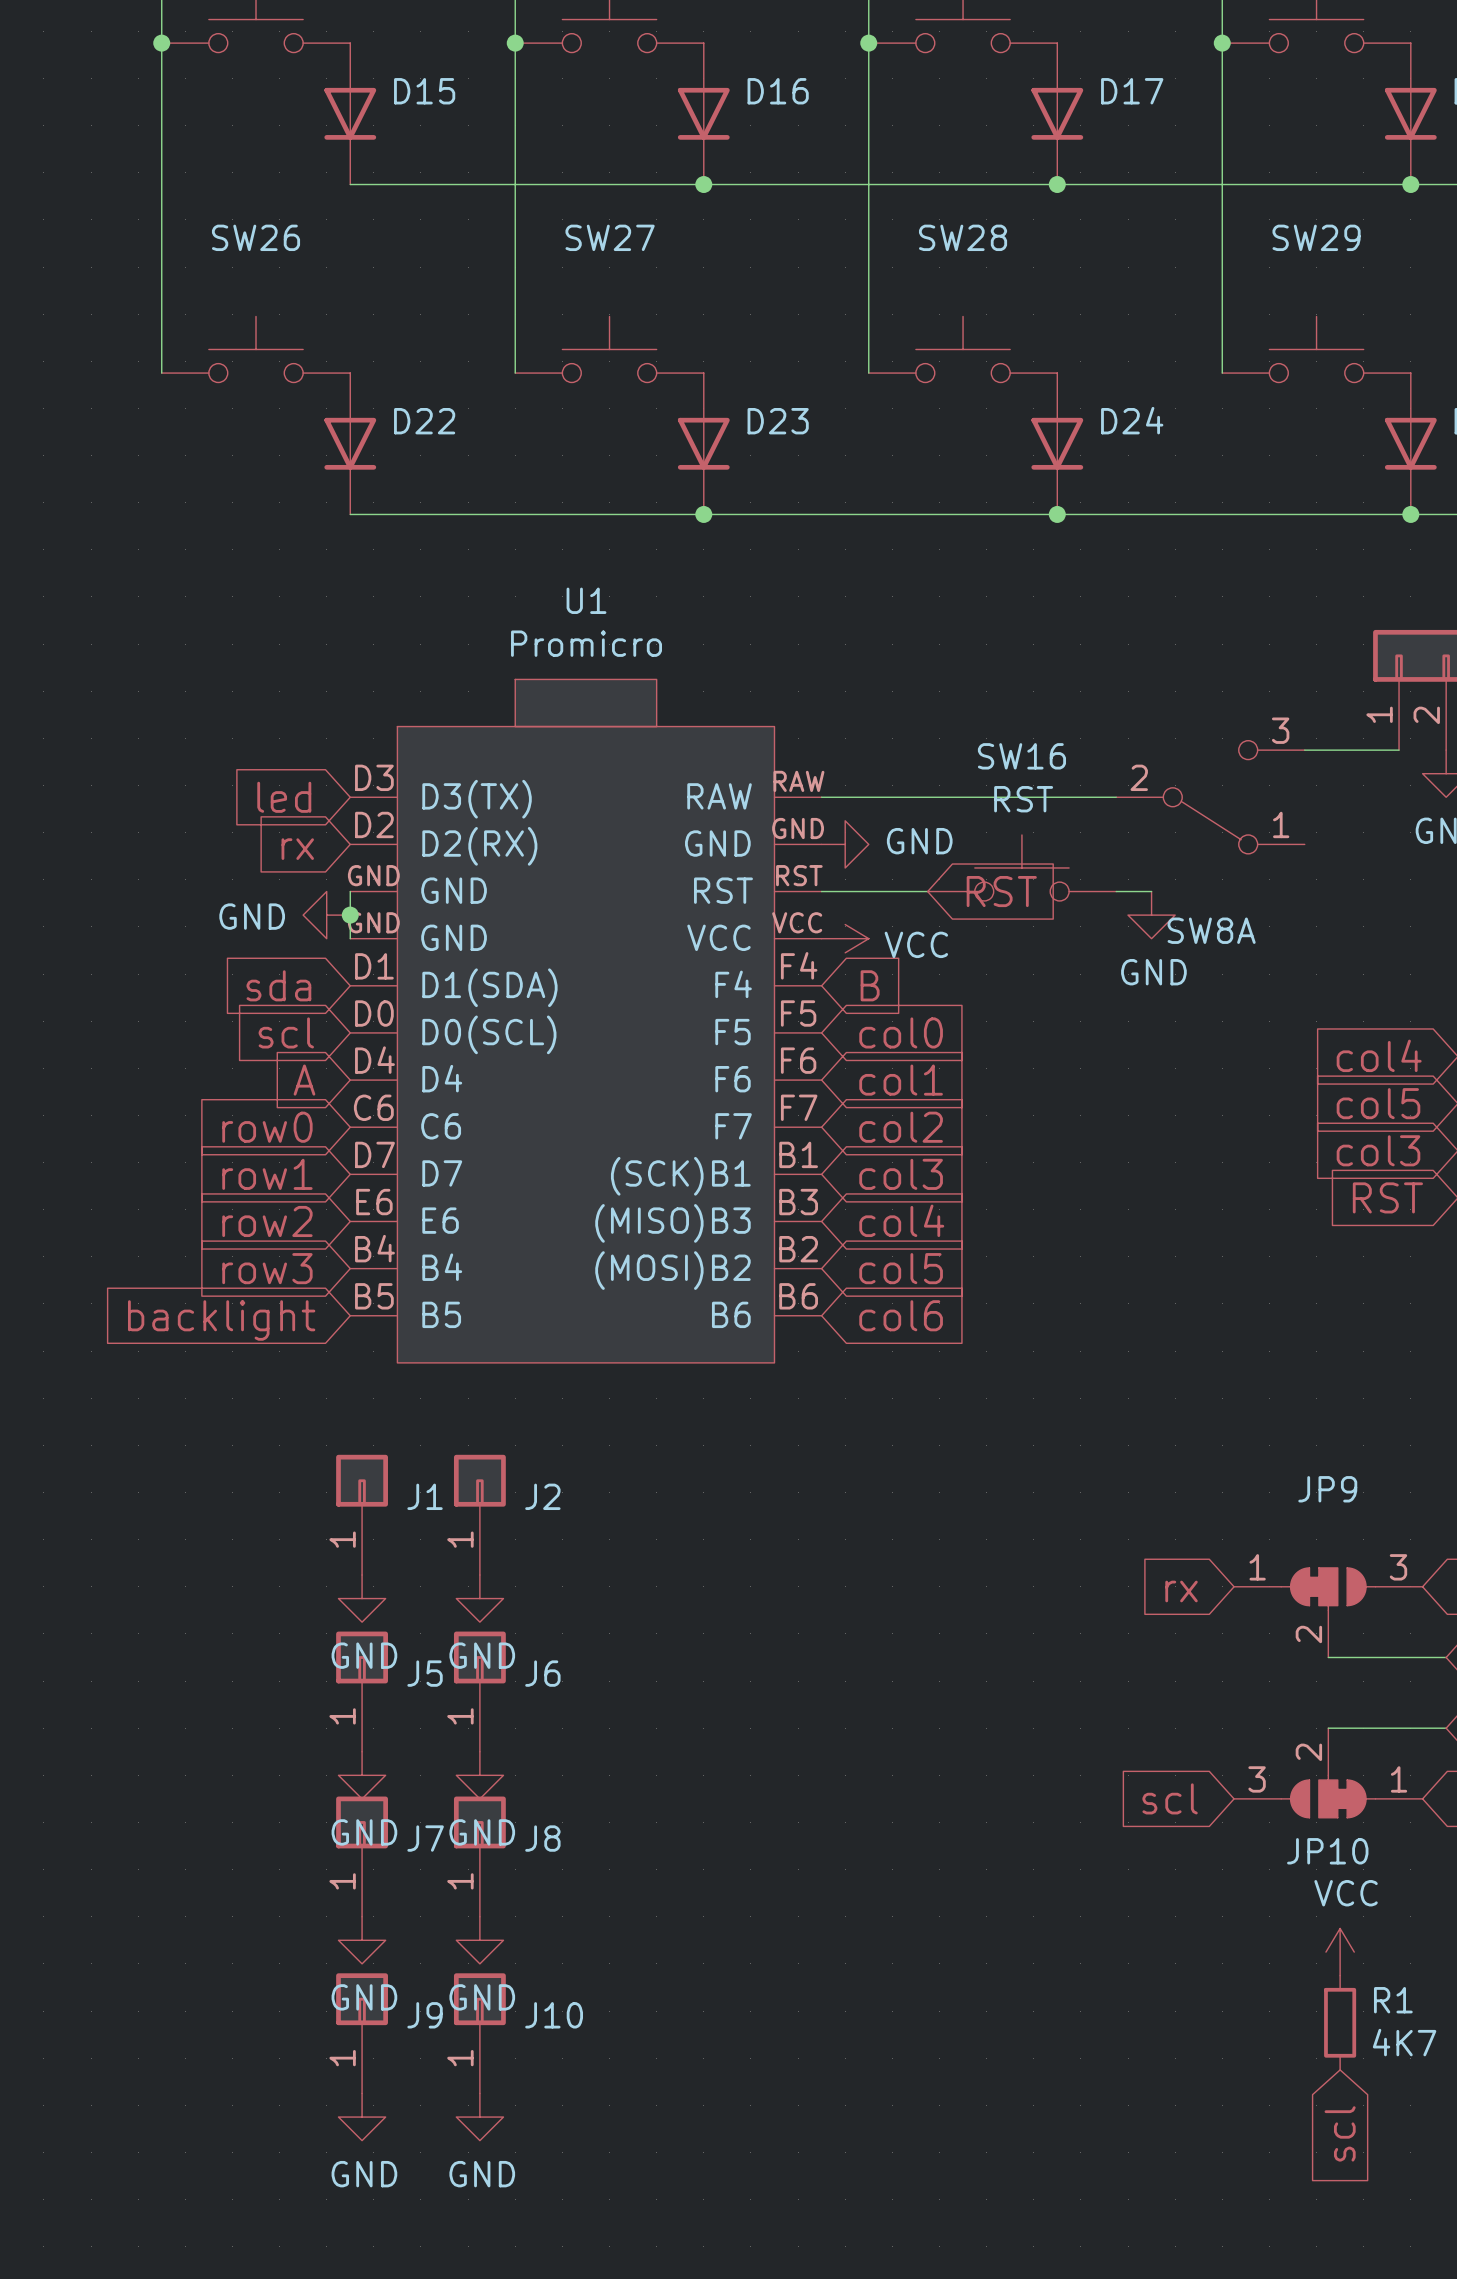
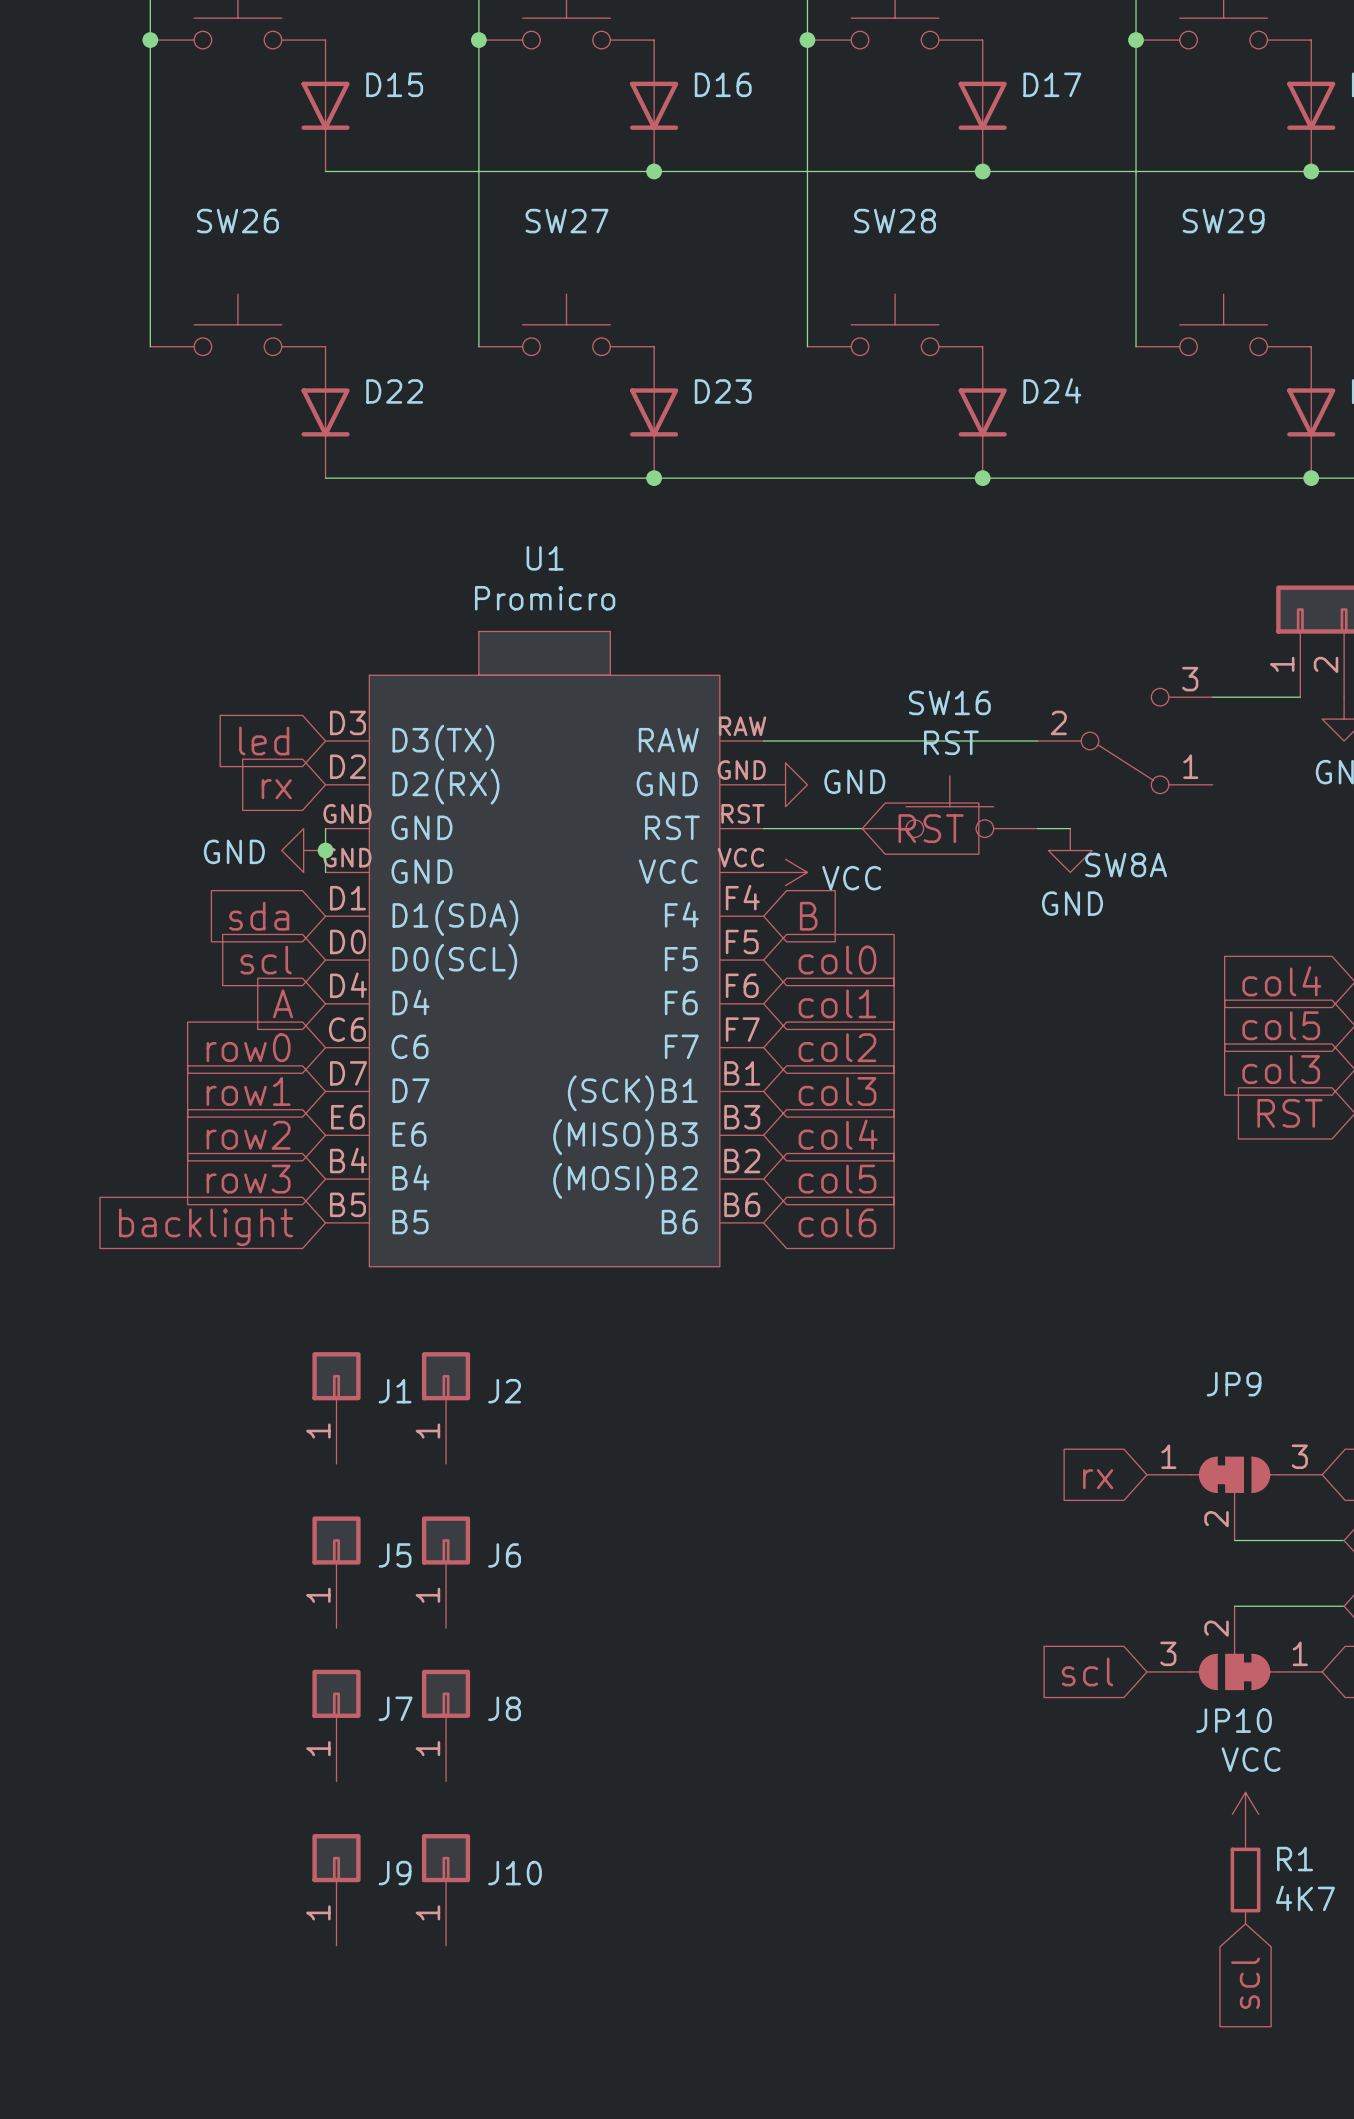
power symbol: GND (362, 1598) -> none
power symbol: GND (479, 1598) -> none
power symbol: GND (362, 1775) -> none
power symbol: GND (479, 1775) -> none
power symbol: GND (362, 1940) -> none
power symbol: GND (479, 1940) -> none
power symbol: GND (362, 2117) -> none
power symbol: GND (479, 2117) -> none

